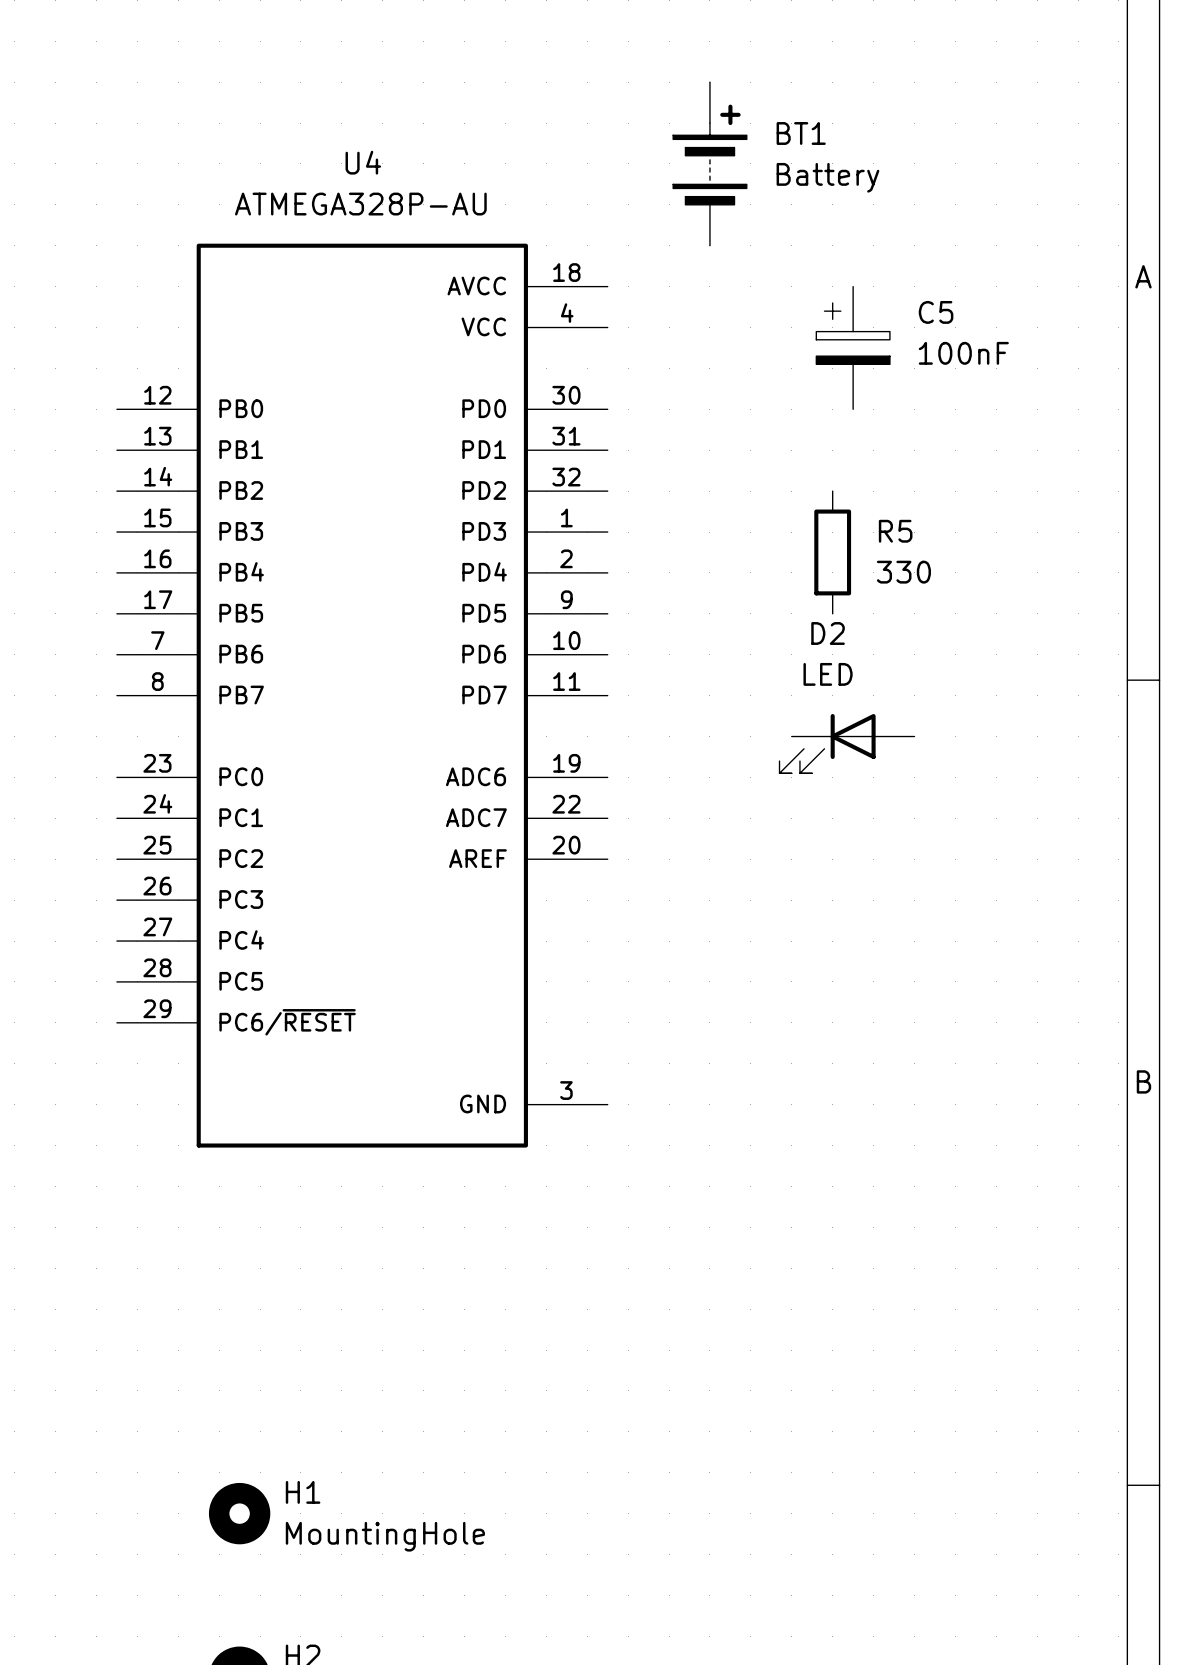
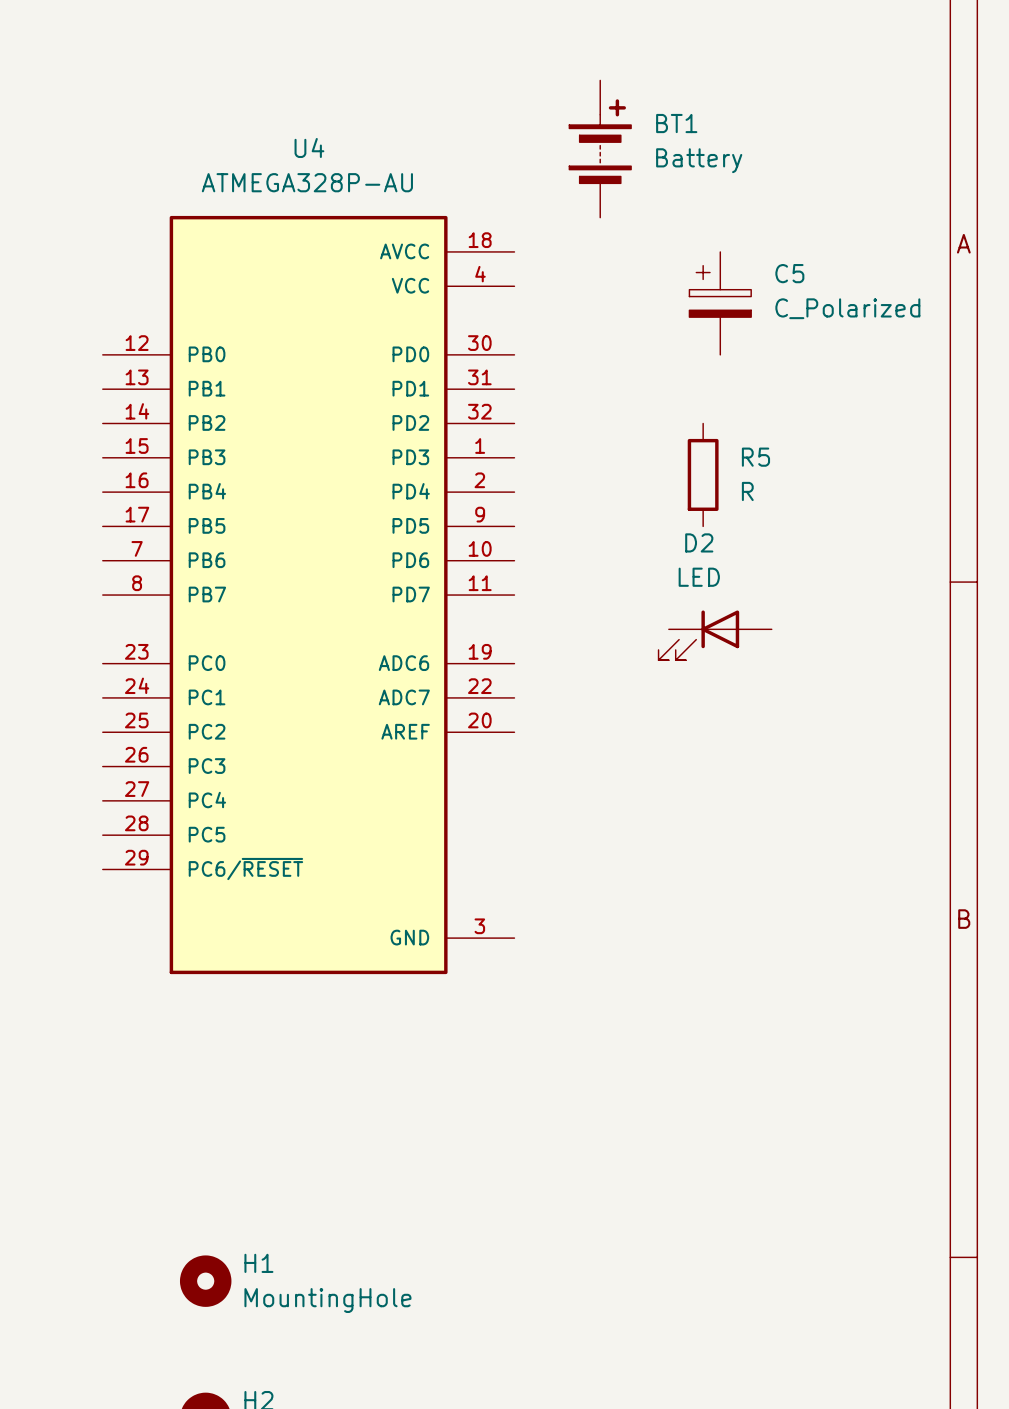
C5 value: 100nF (963, 353) -> C_Polarized (847, 308)
R5 value: 330 (903, 572) -> R (747, 491)

